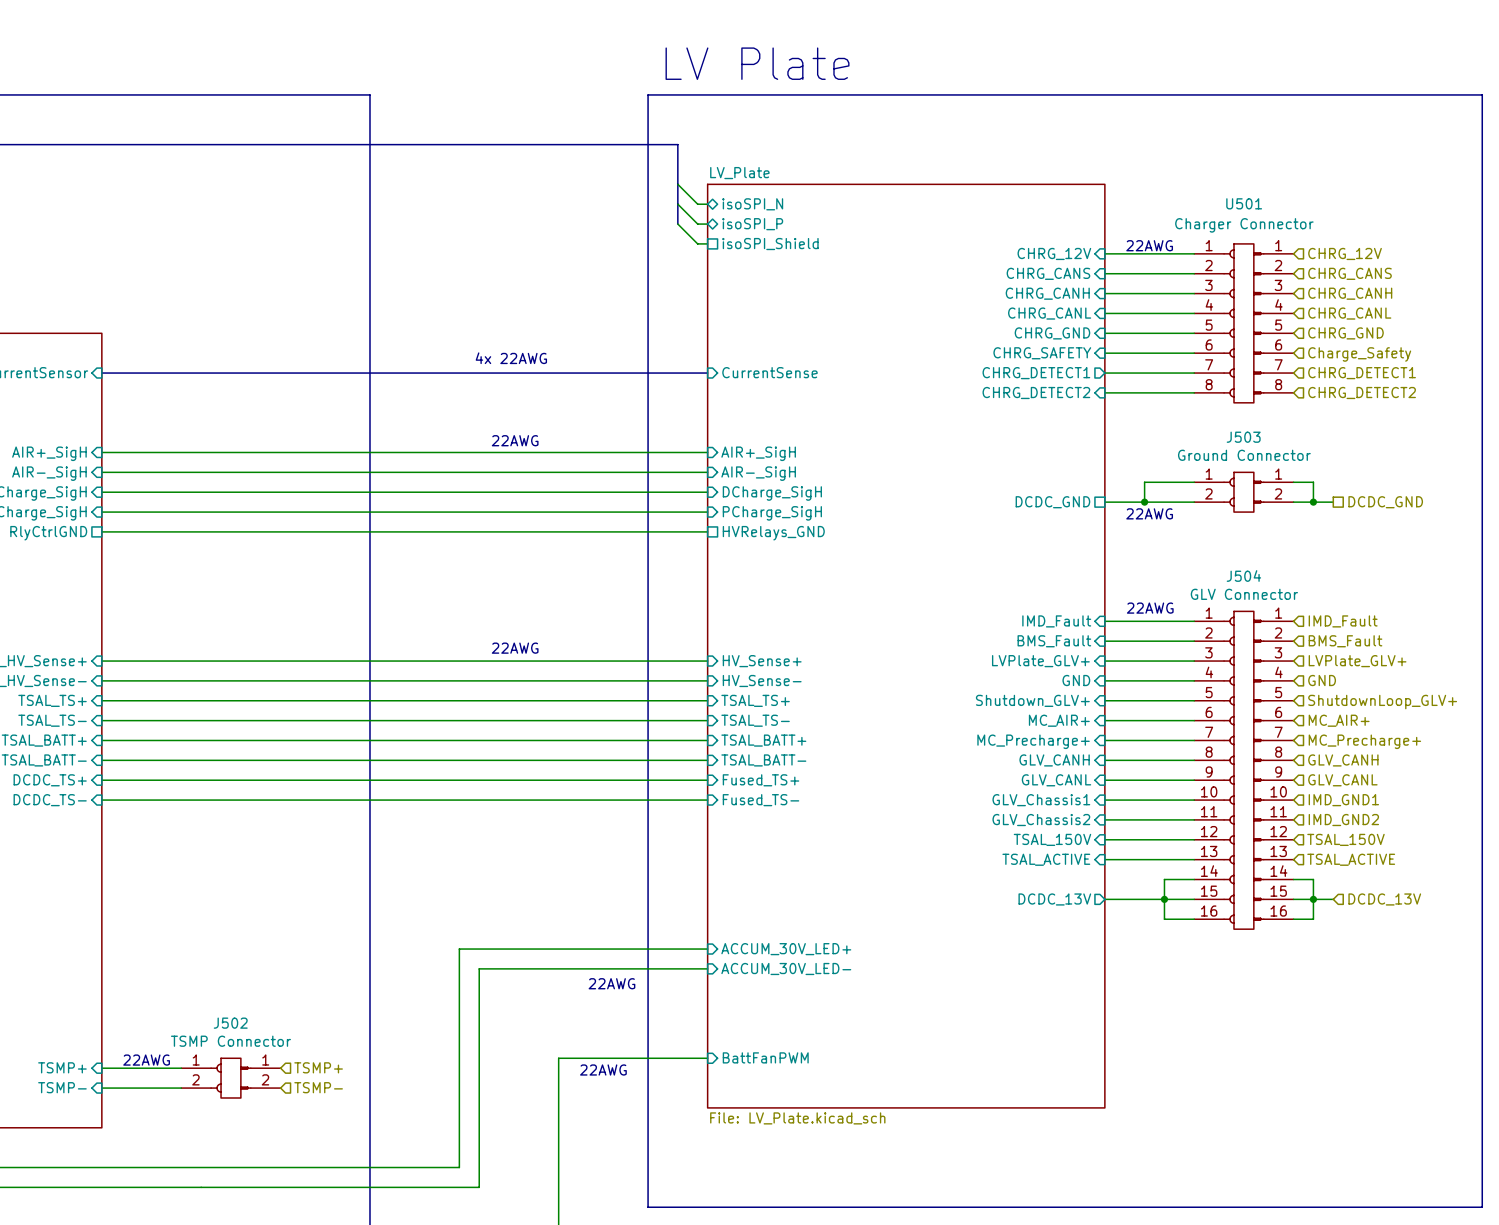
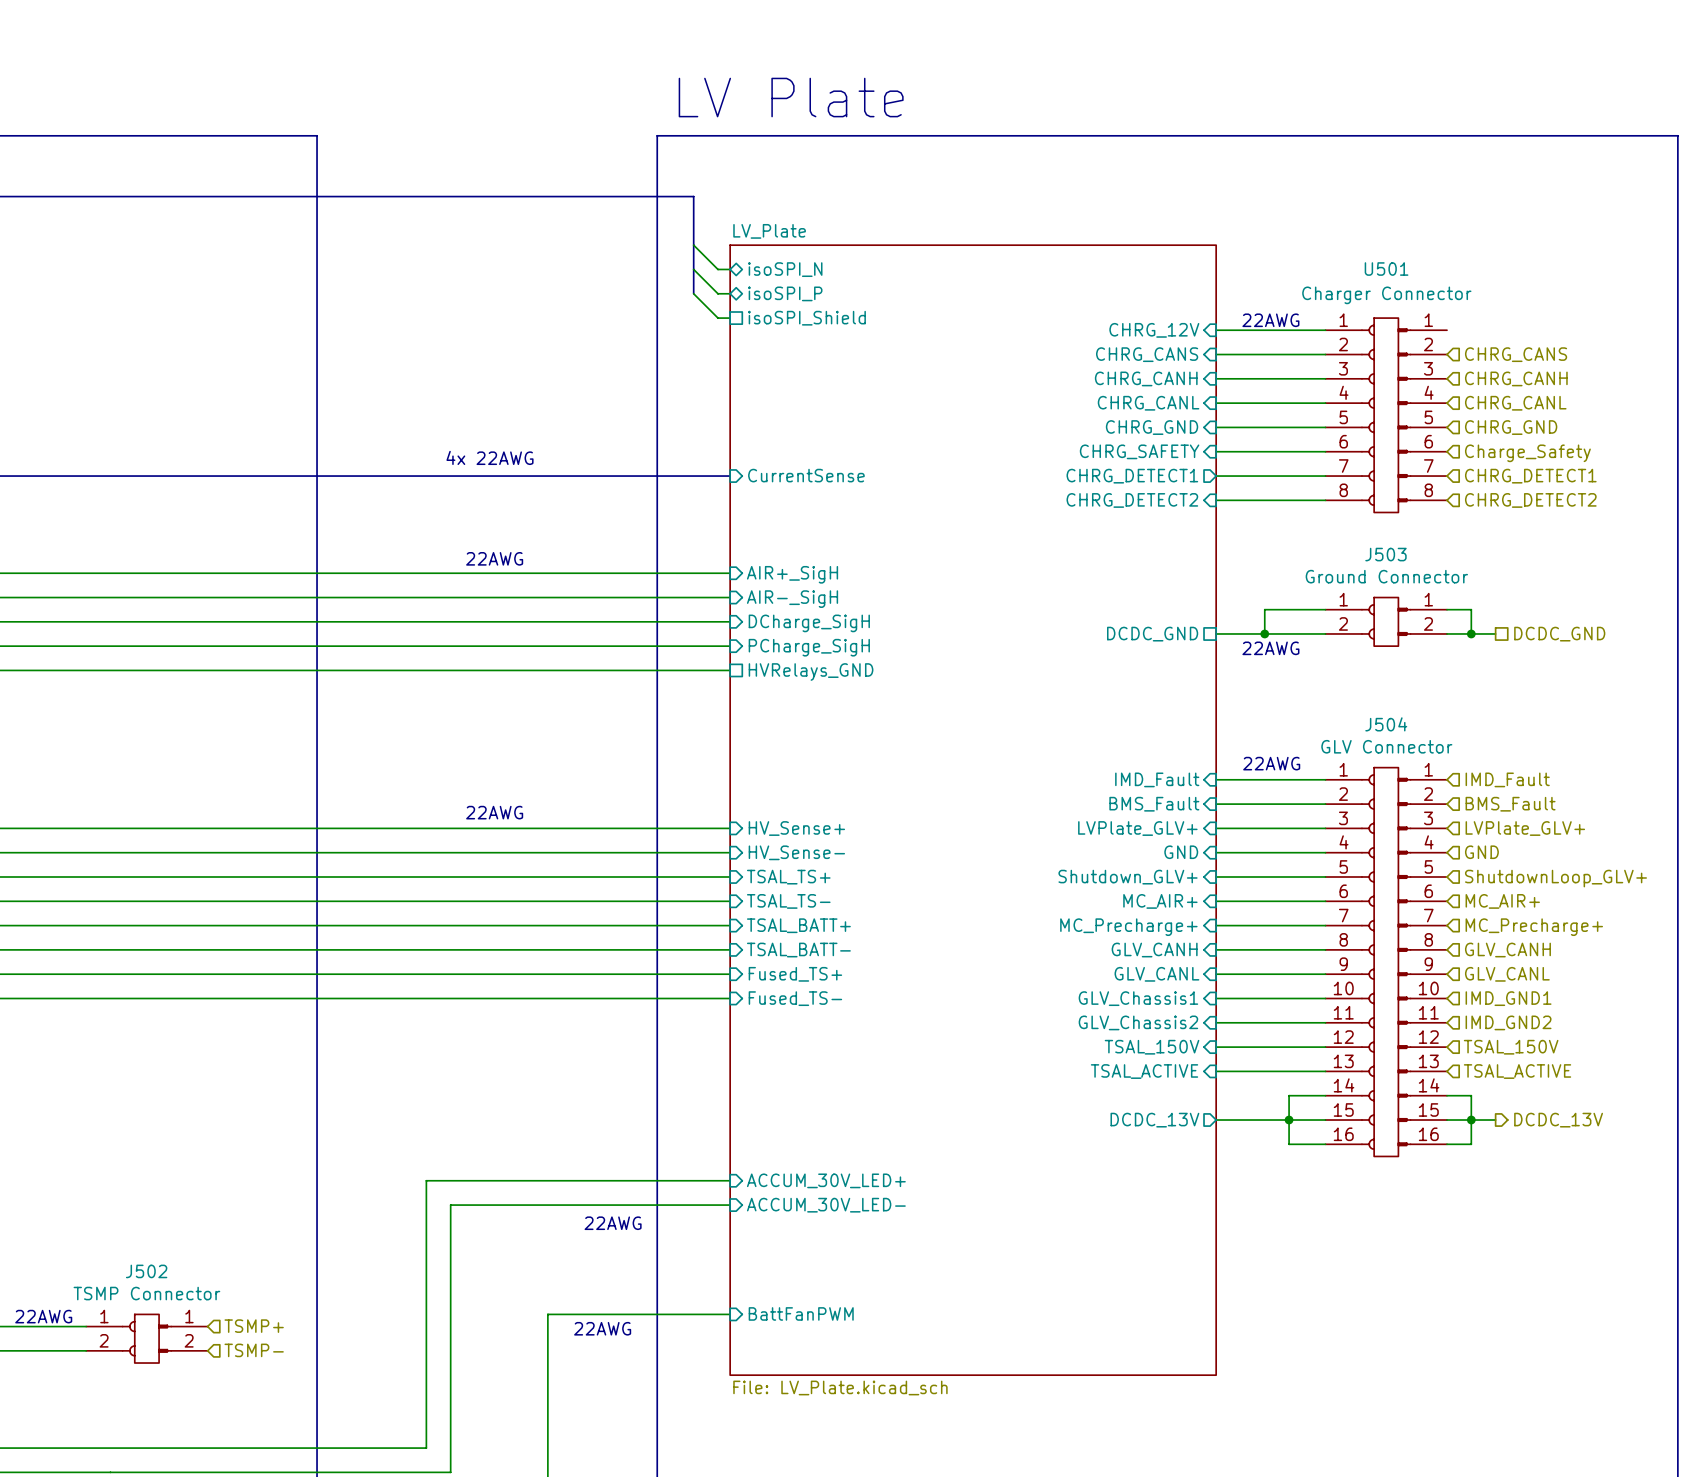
hierarchical label: CHRG_12V (1345, 253) -> none
hierarchical label shape: input (1384, 899) -> output (1558, 1120)

